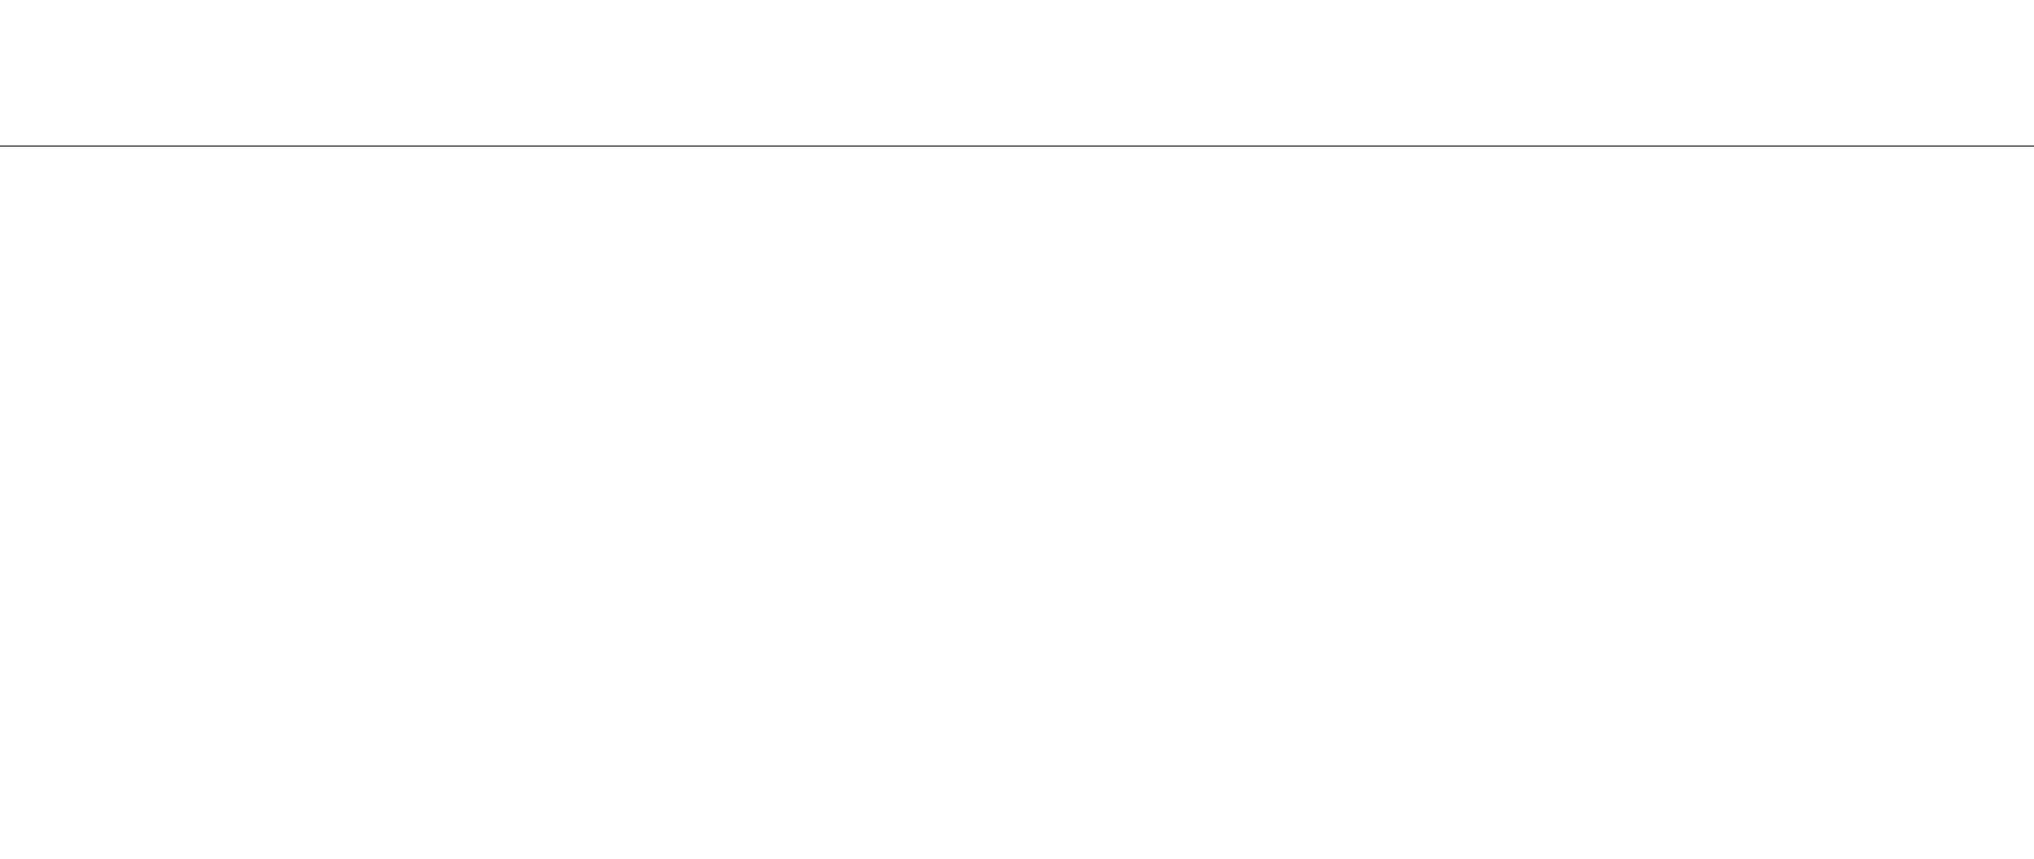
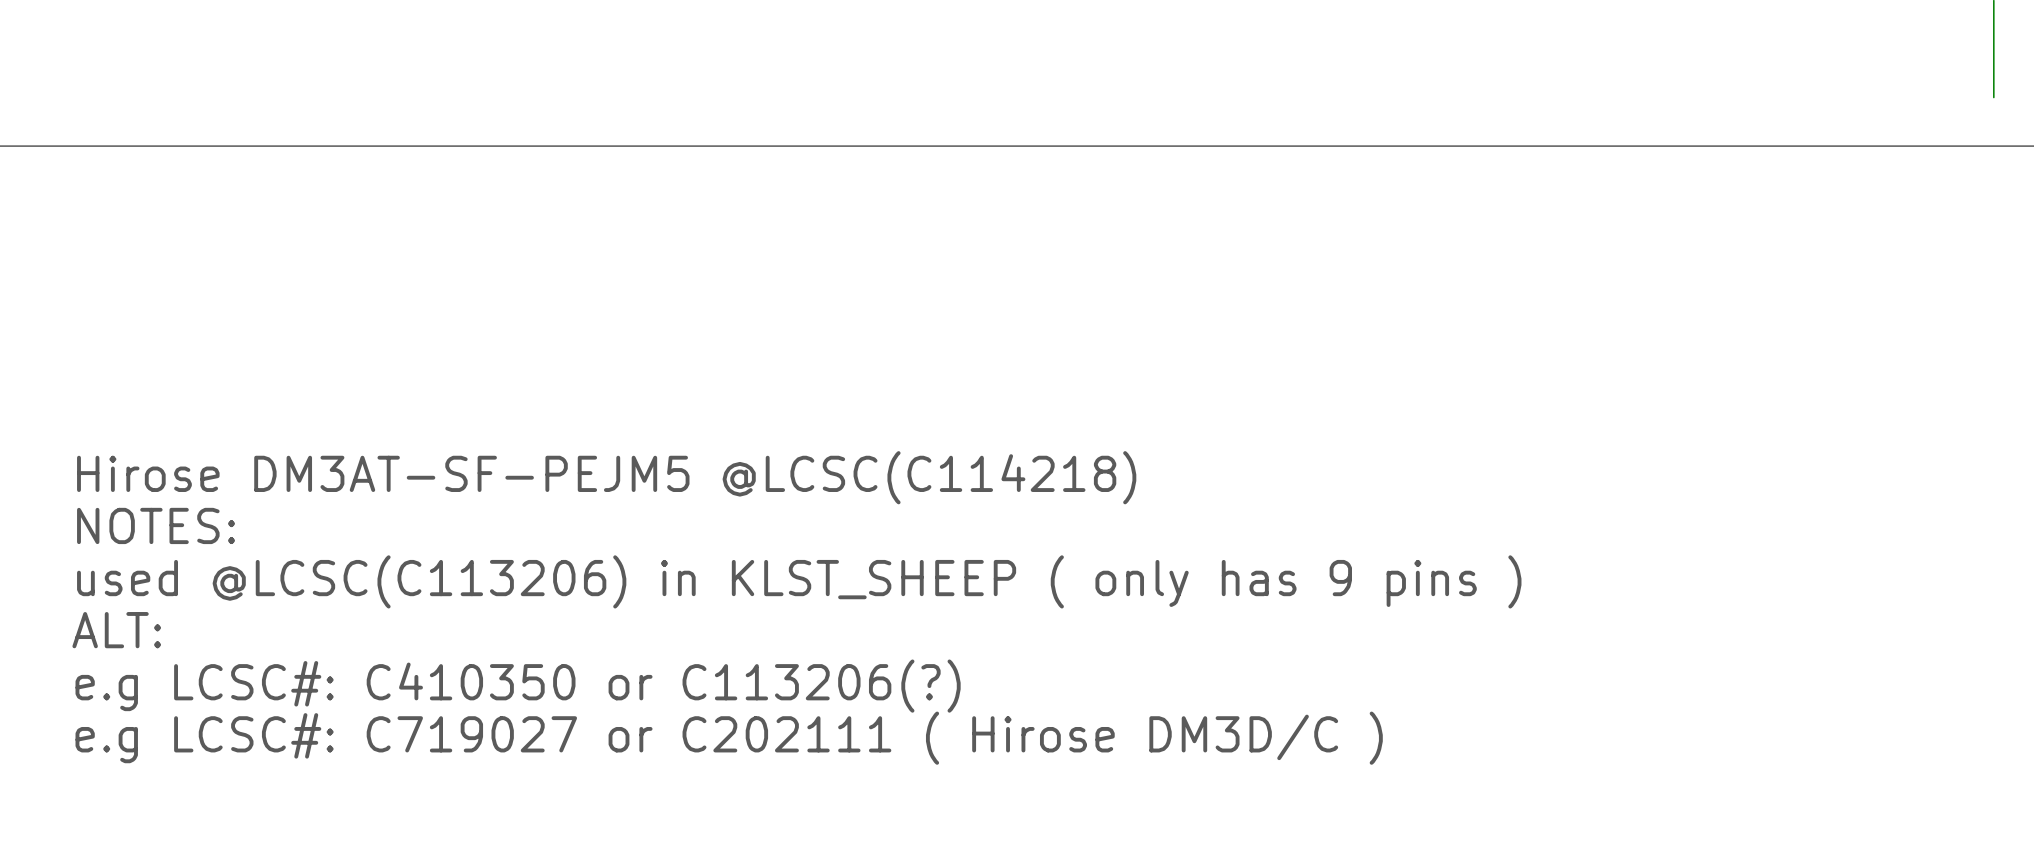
wire: none -> (1993, 0) (1993, 97)
text: none -> Hirose DM3AT-SF-PEJM5 @LCSC(C114218) (606, 477)
text: none -> NOTES: (156, 525)
text: none -> used @LCSC(C113206) in KLST_SHEEP ( only has 9 pins ) (799, 581)
text: none -> ALT: (116, 630)
text: none -> e.g LCSC#: C410350 or C113206(?) (518, 686)
text: none -> e.g LCSC#: C719027 or C202111 ( Hirose DM3D/C ) (729, 738)

